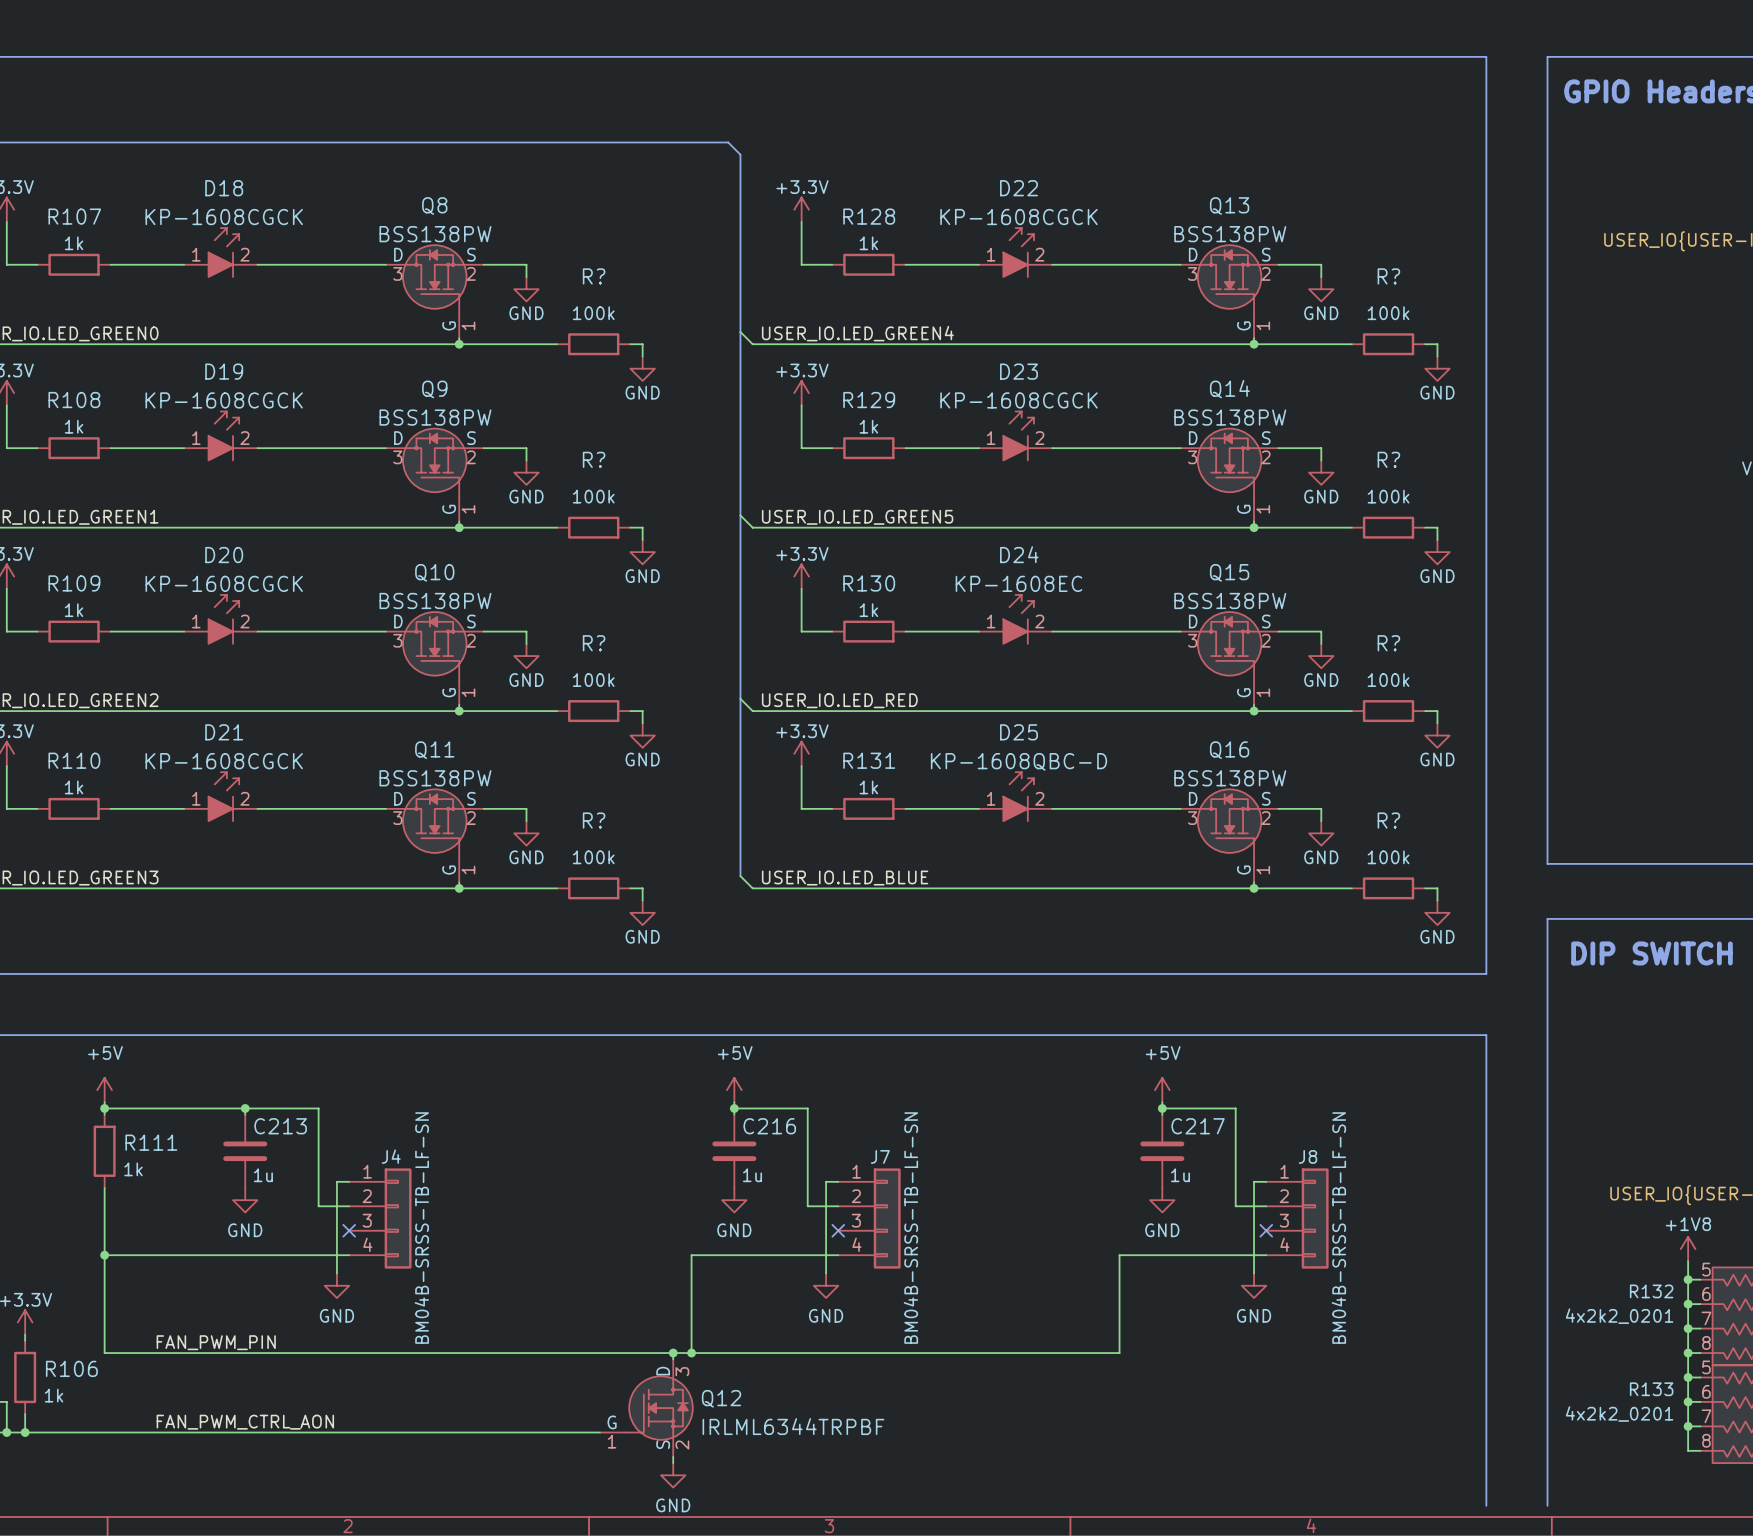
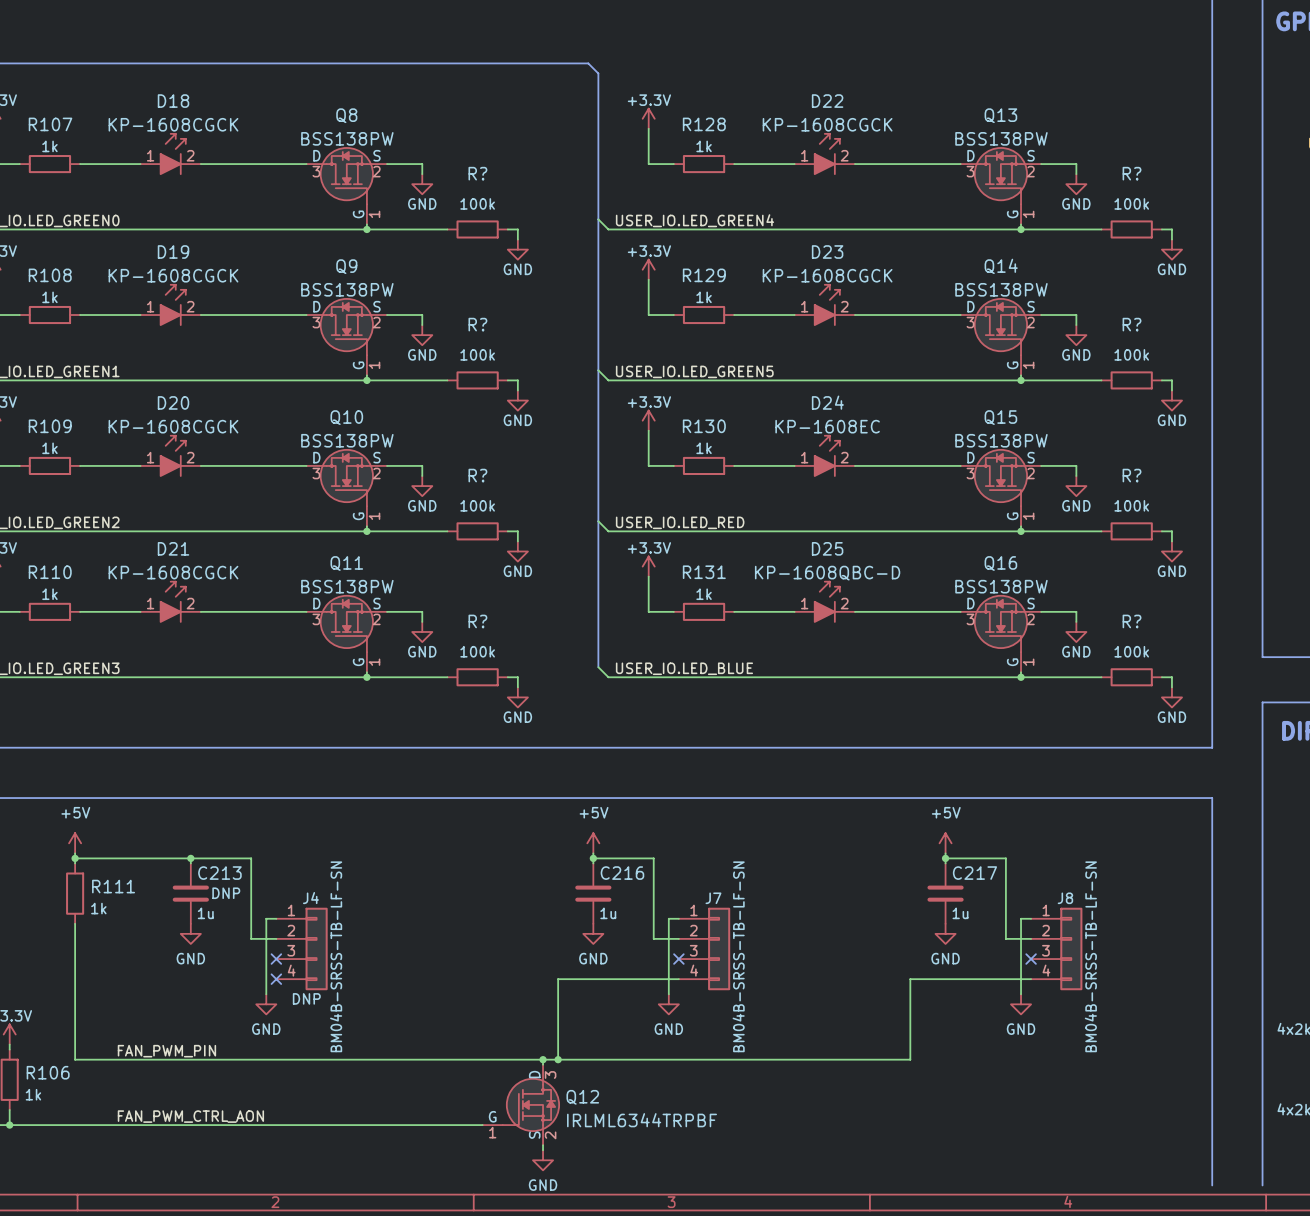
C213 text: none -> DNP (226, 893)
wire: (104, 1255) (349, 1255) -> none
junction: (104, 1255) -> none
no-connect mark: none -> (276, 979)
J4 text: none -> DNP (306, 998)

